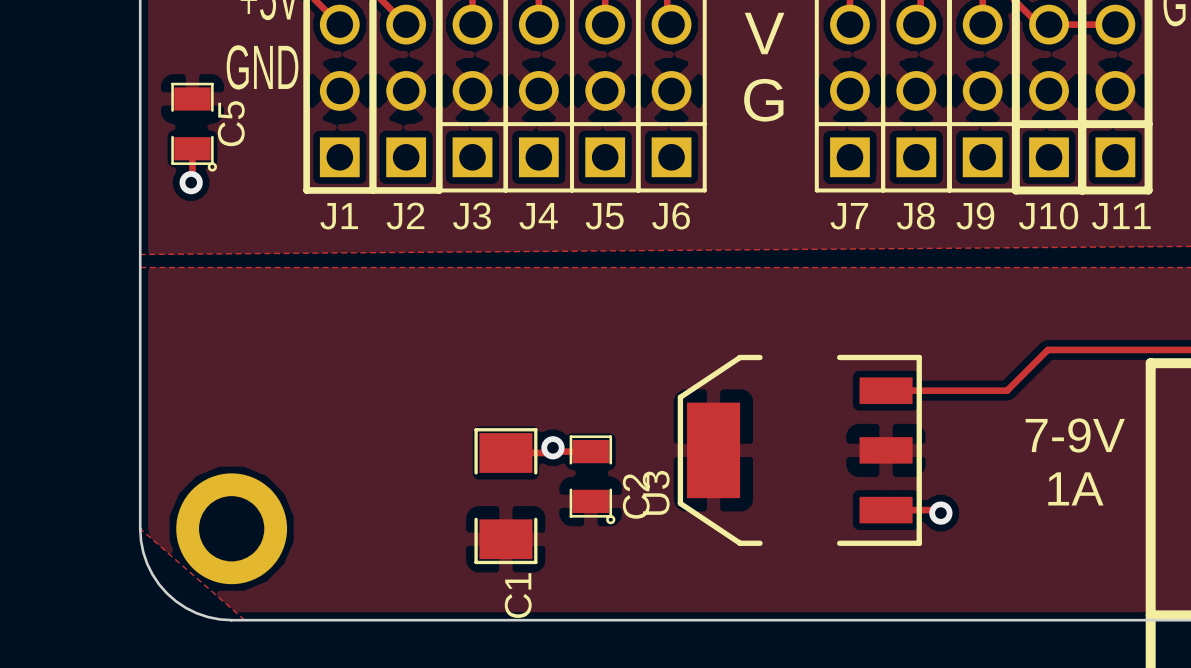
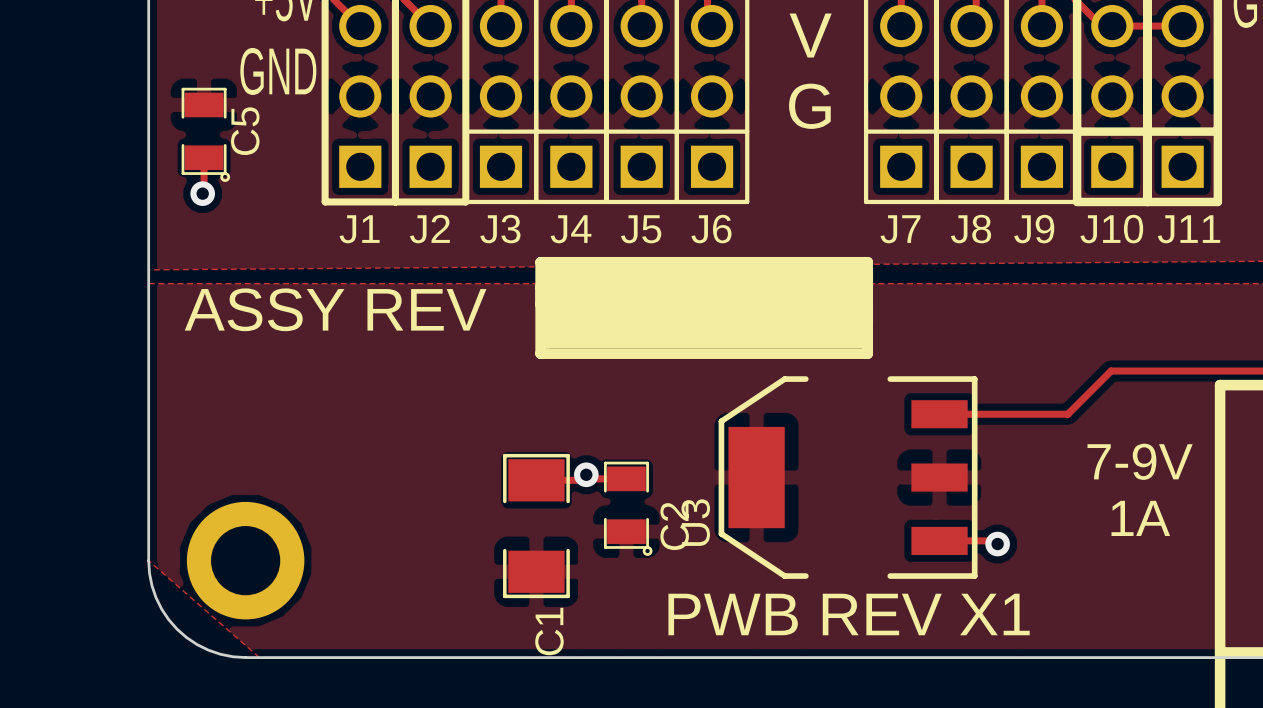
drawing: none -> [535, 256, 874, 359]
text: none -> ASSY REV (335, 309)
text: none -> PWB REV X1 (849, 614)

